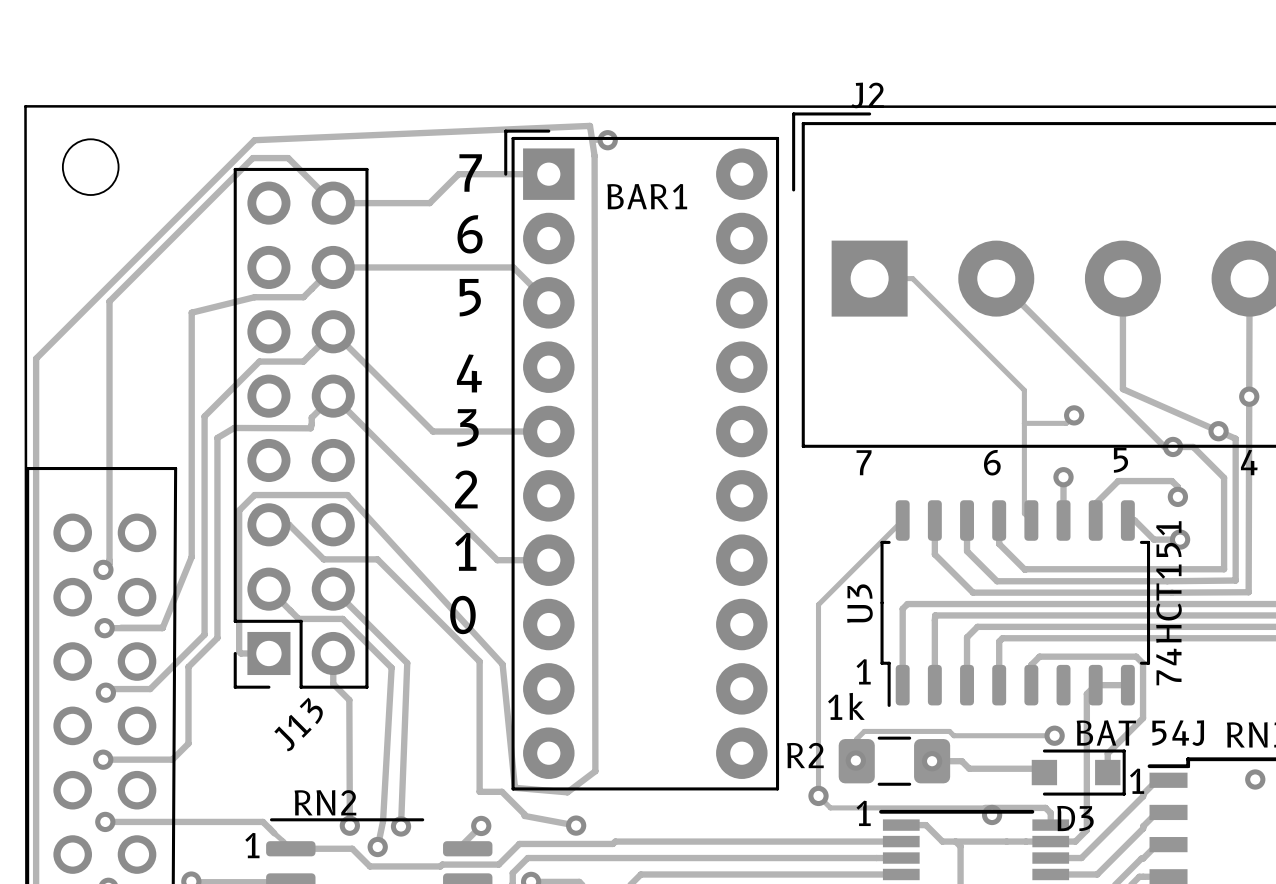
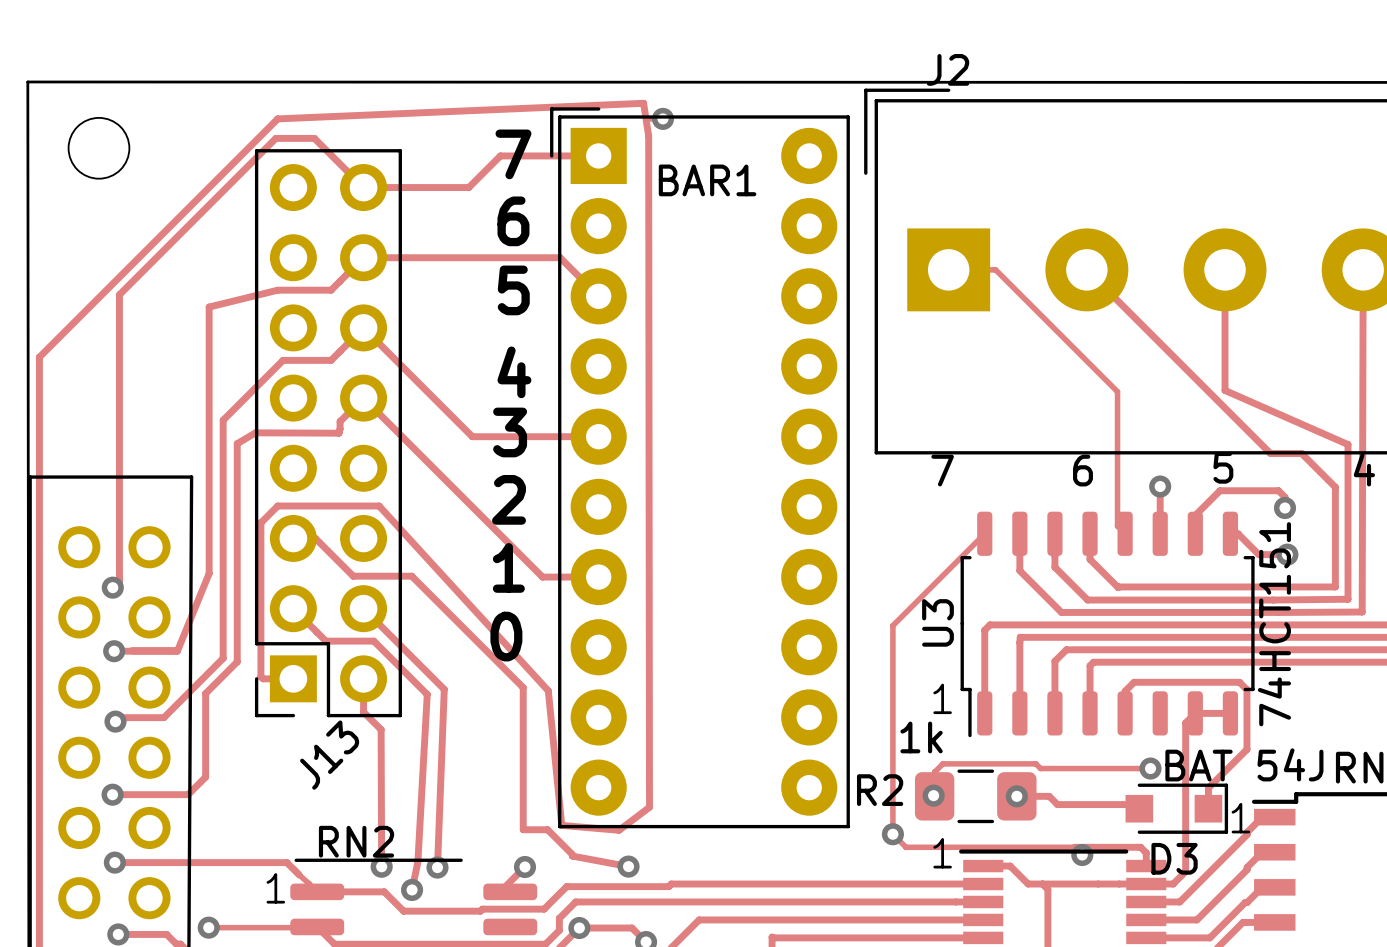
via: (1249, 396) -> none
track: (1074, 415) (1066, 423) (1024, 423) -> none
via: (1074, 415) -> none
via: (1218, 431) -> none
via: (1173, 446) -> none
via: (1255, 779) -> none

